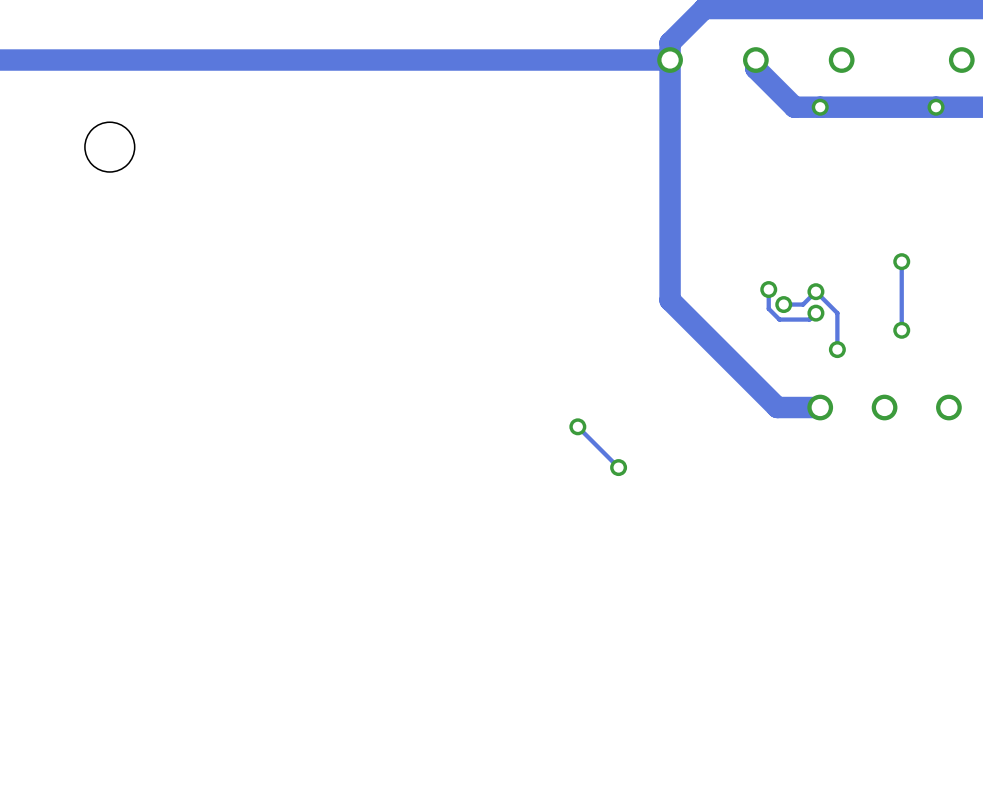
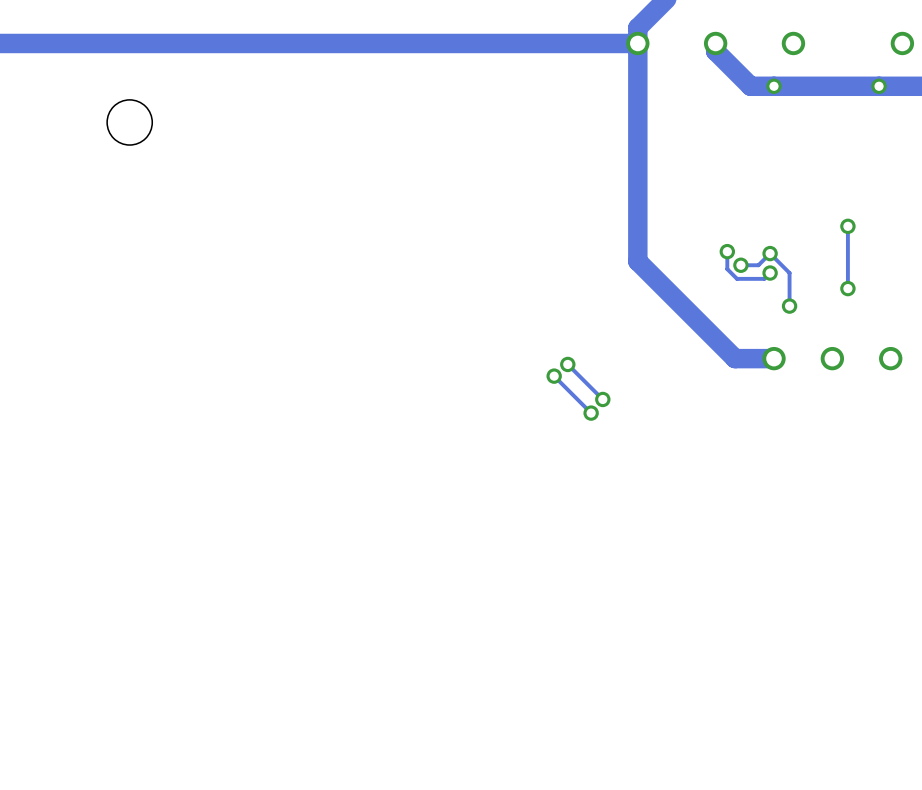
track: none -> (567, 364) (602, 399)
via: none -> (567, 364)
via: none -> (602, 399)

